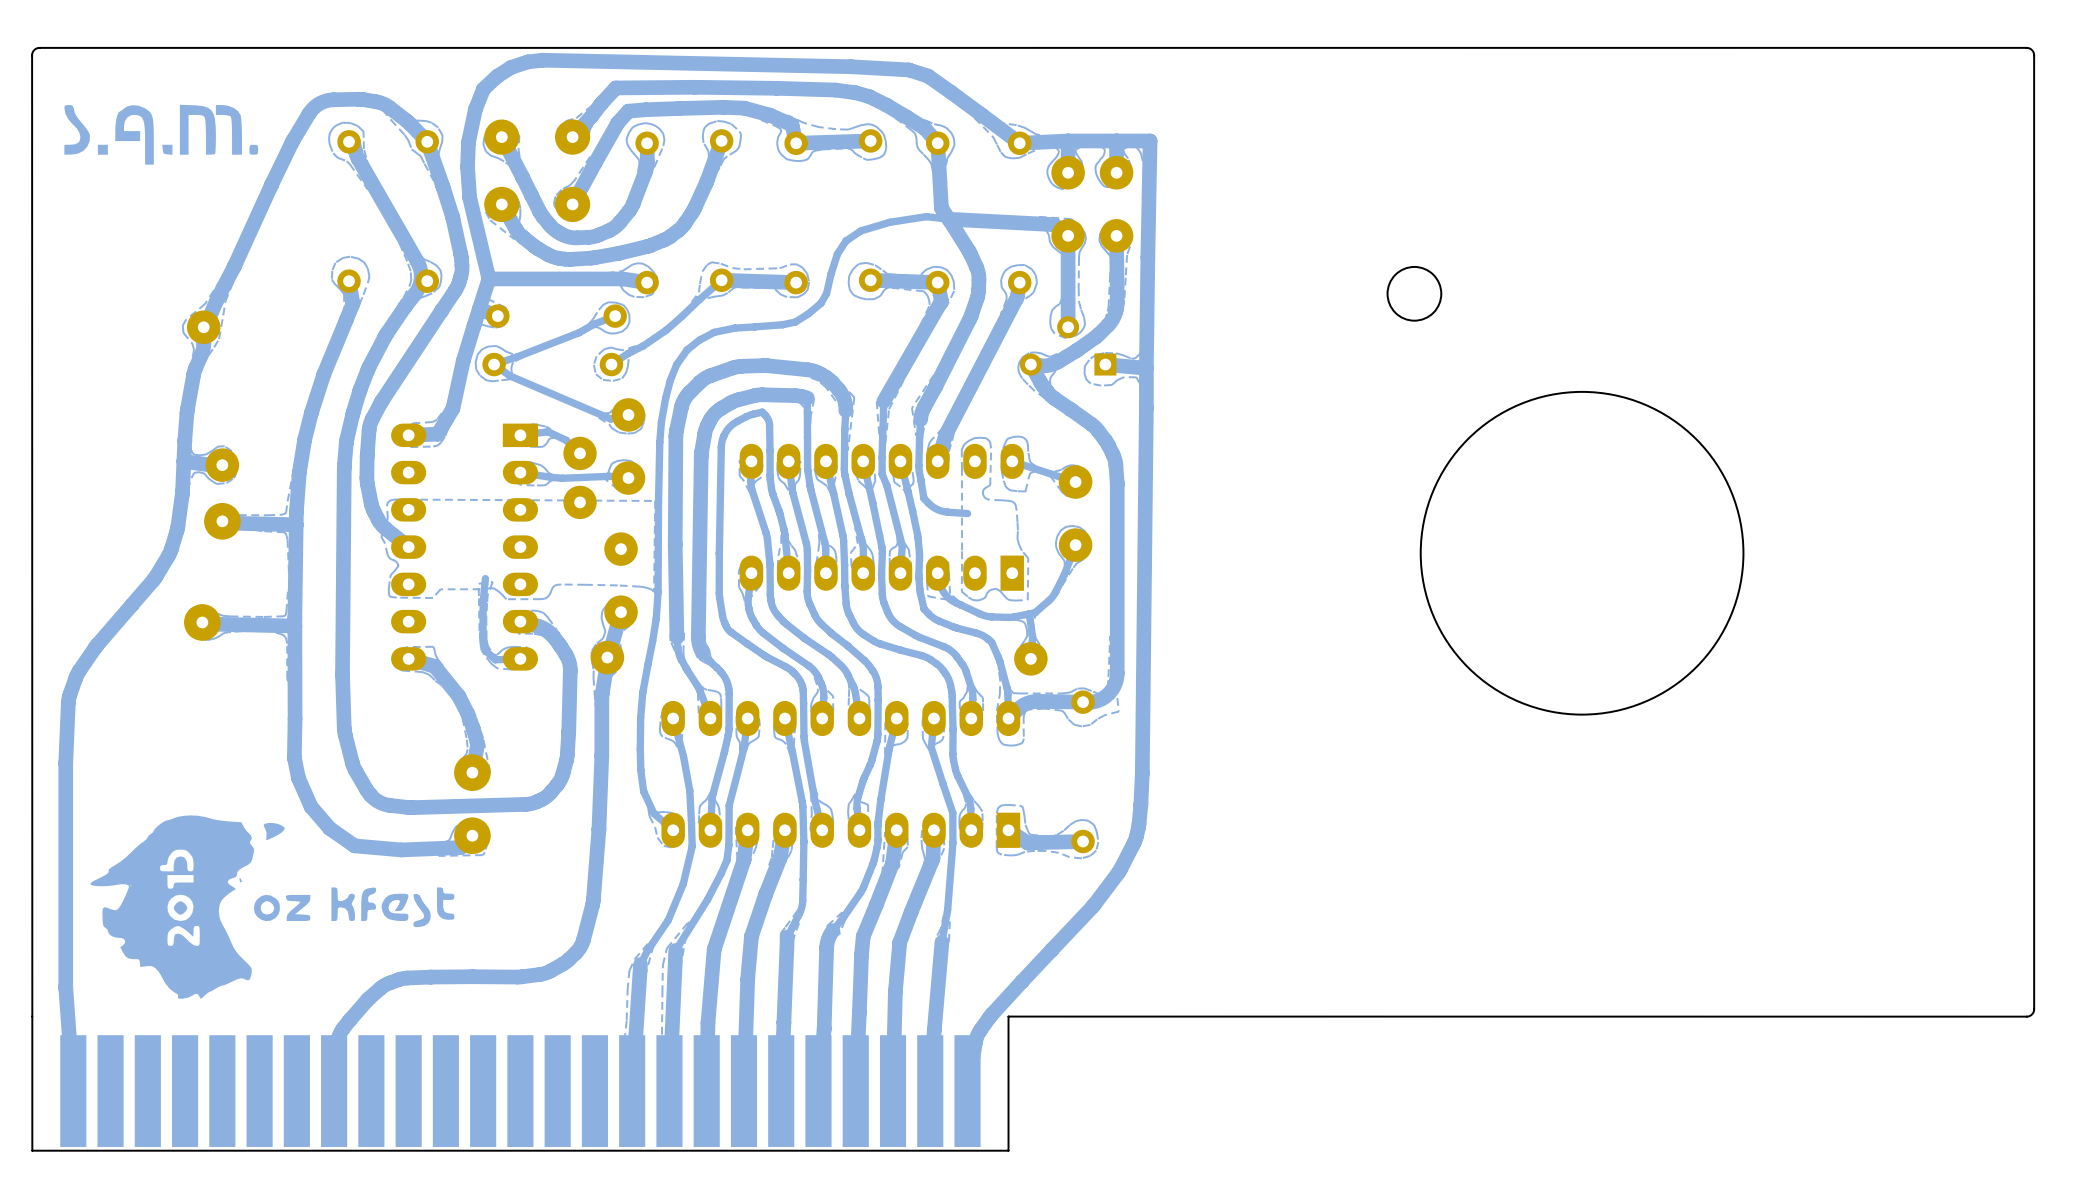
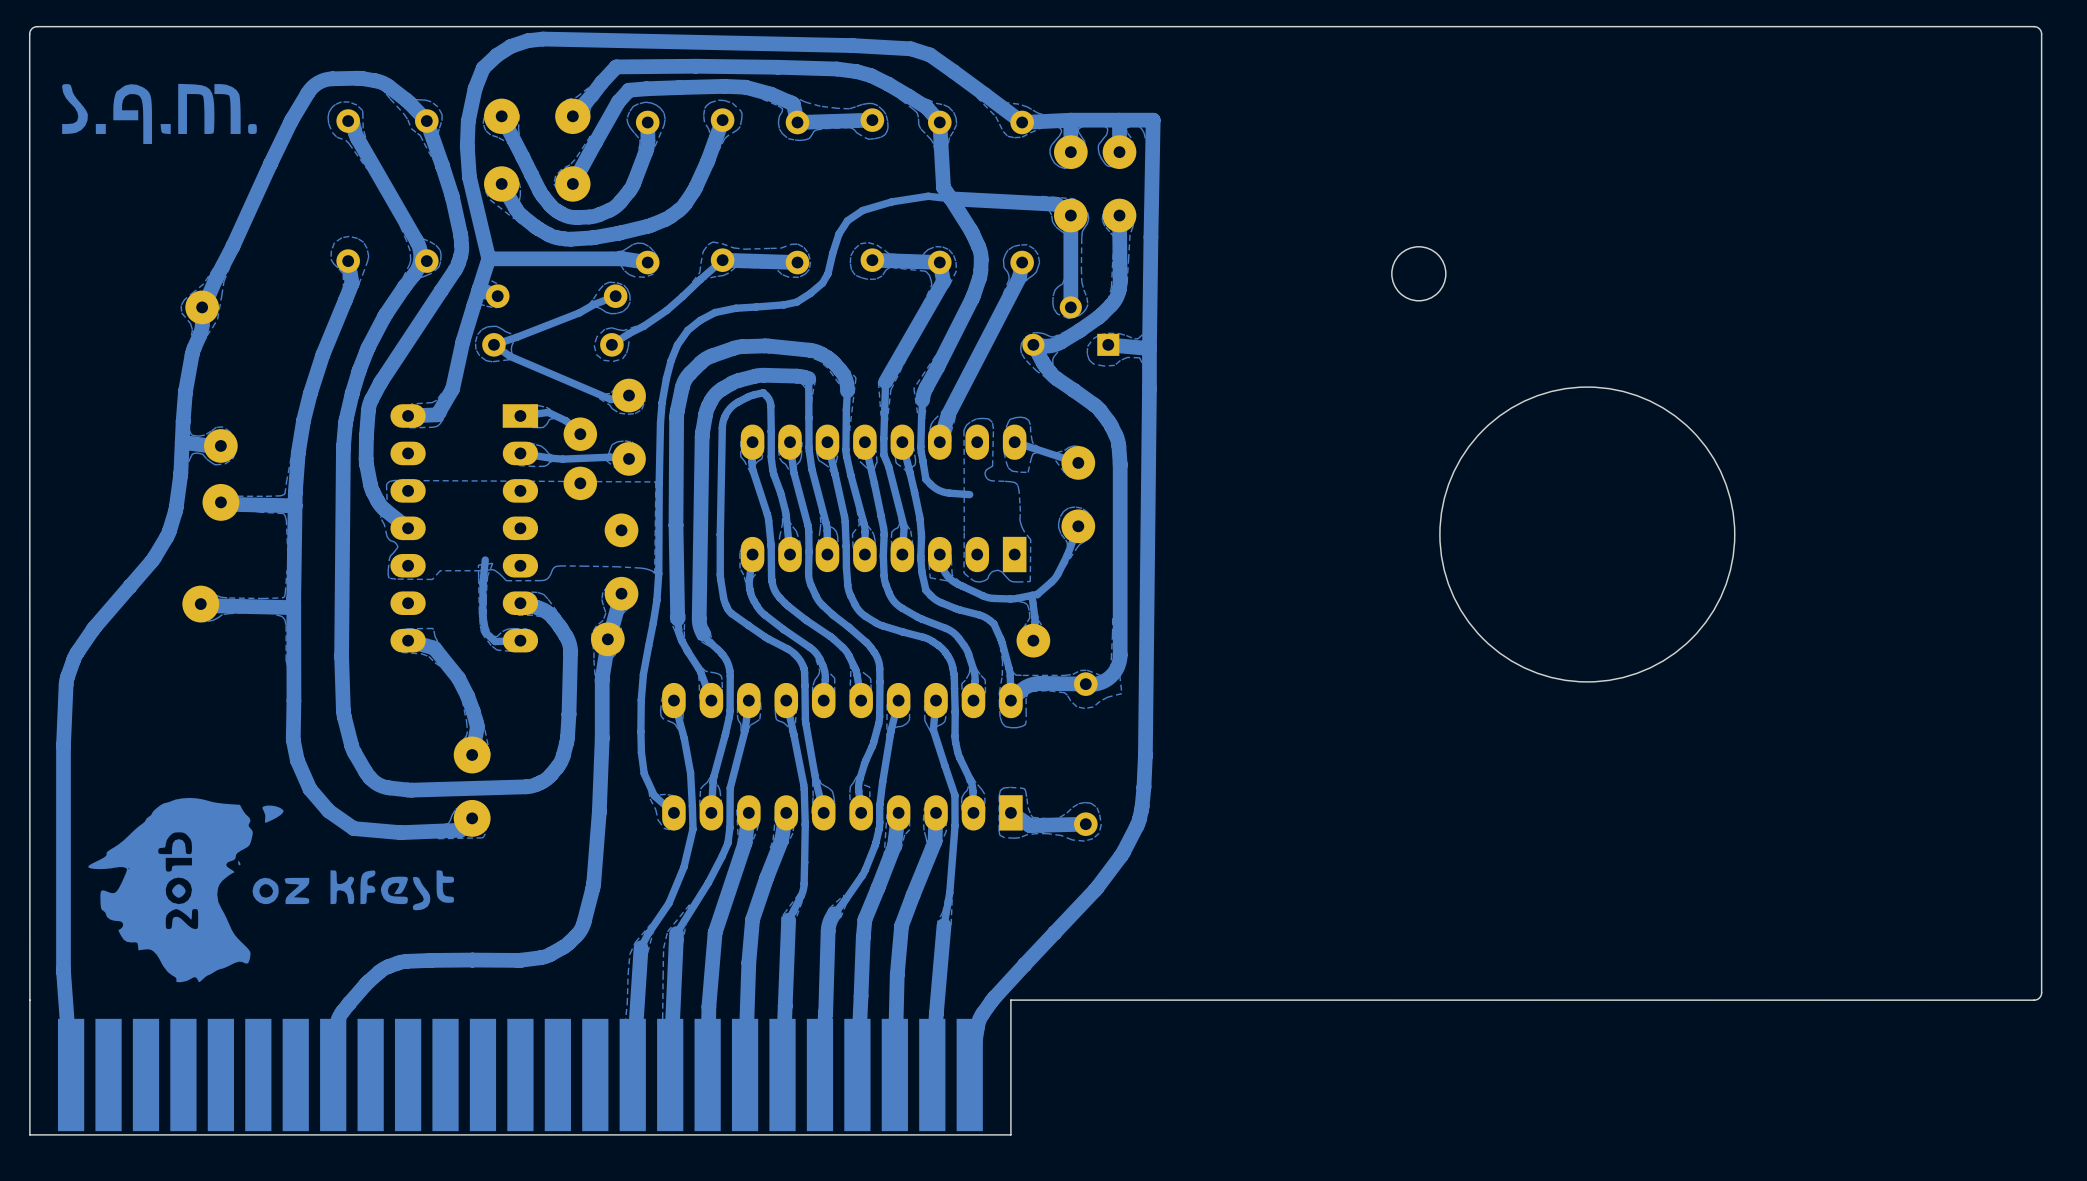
round board edge size: [1419, 391, 1745, 716] -> [1439, 386, 1736, 683]

